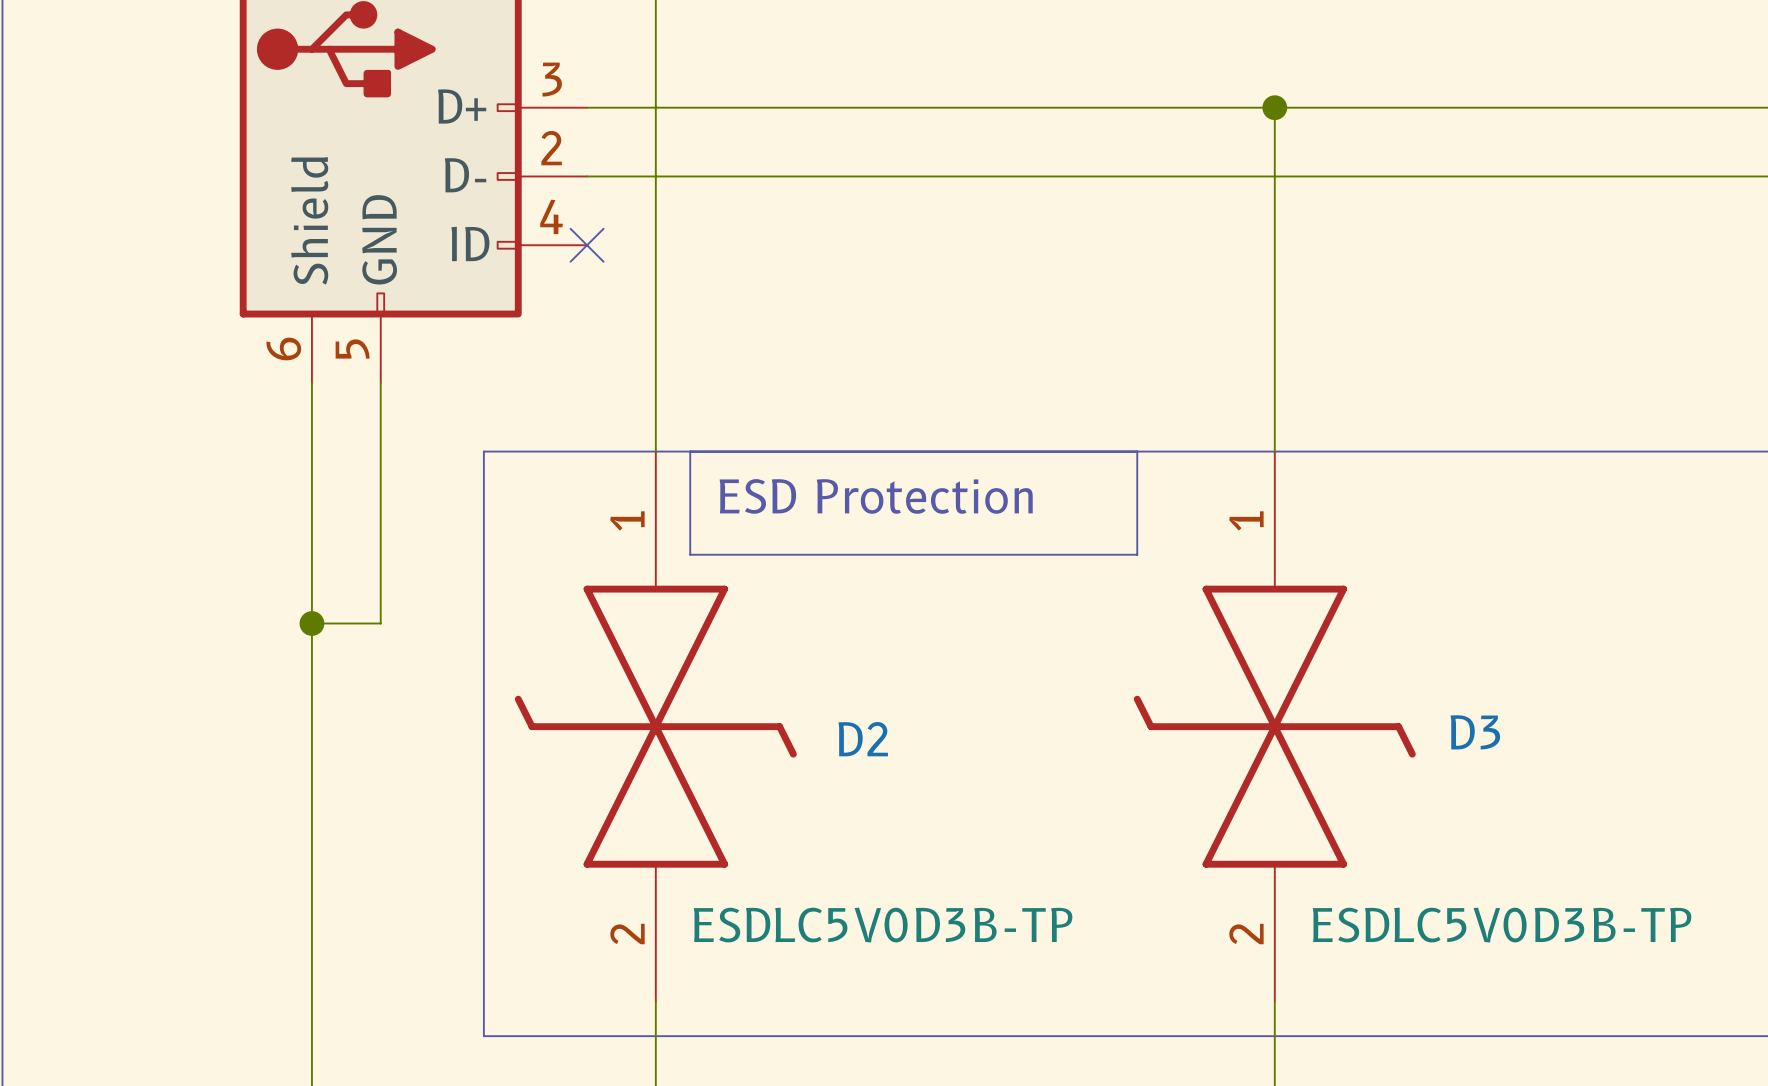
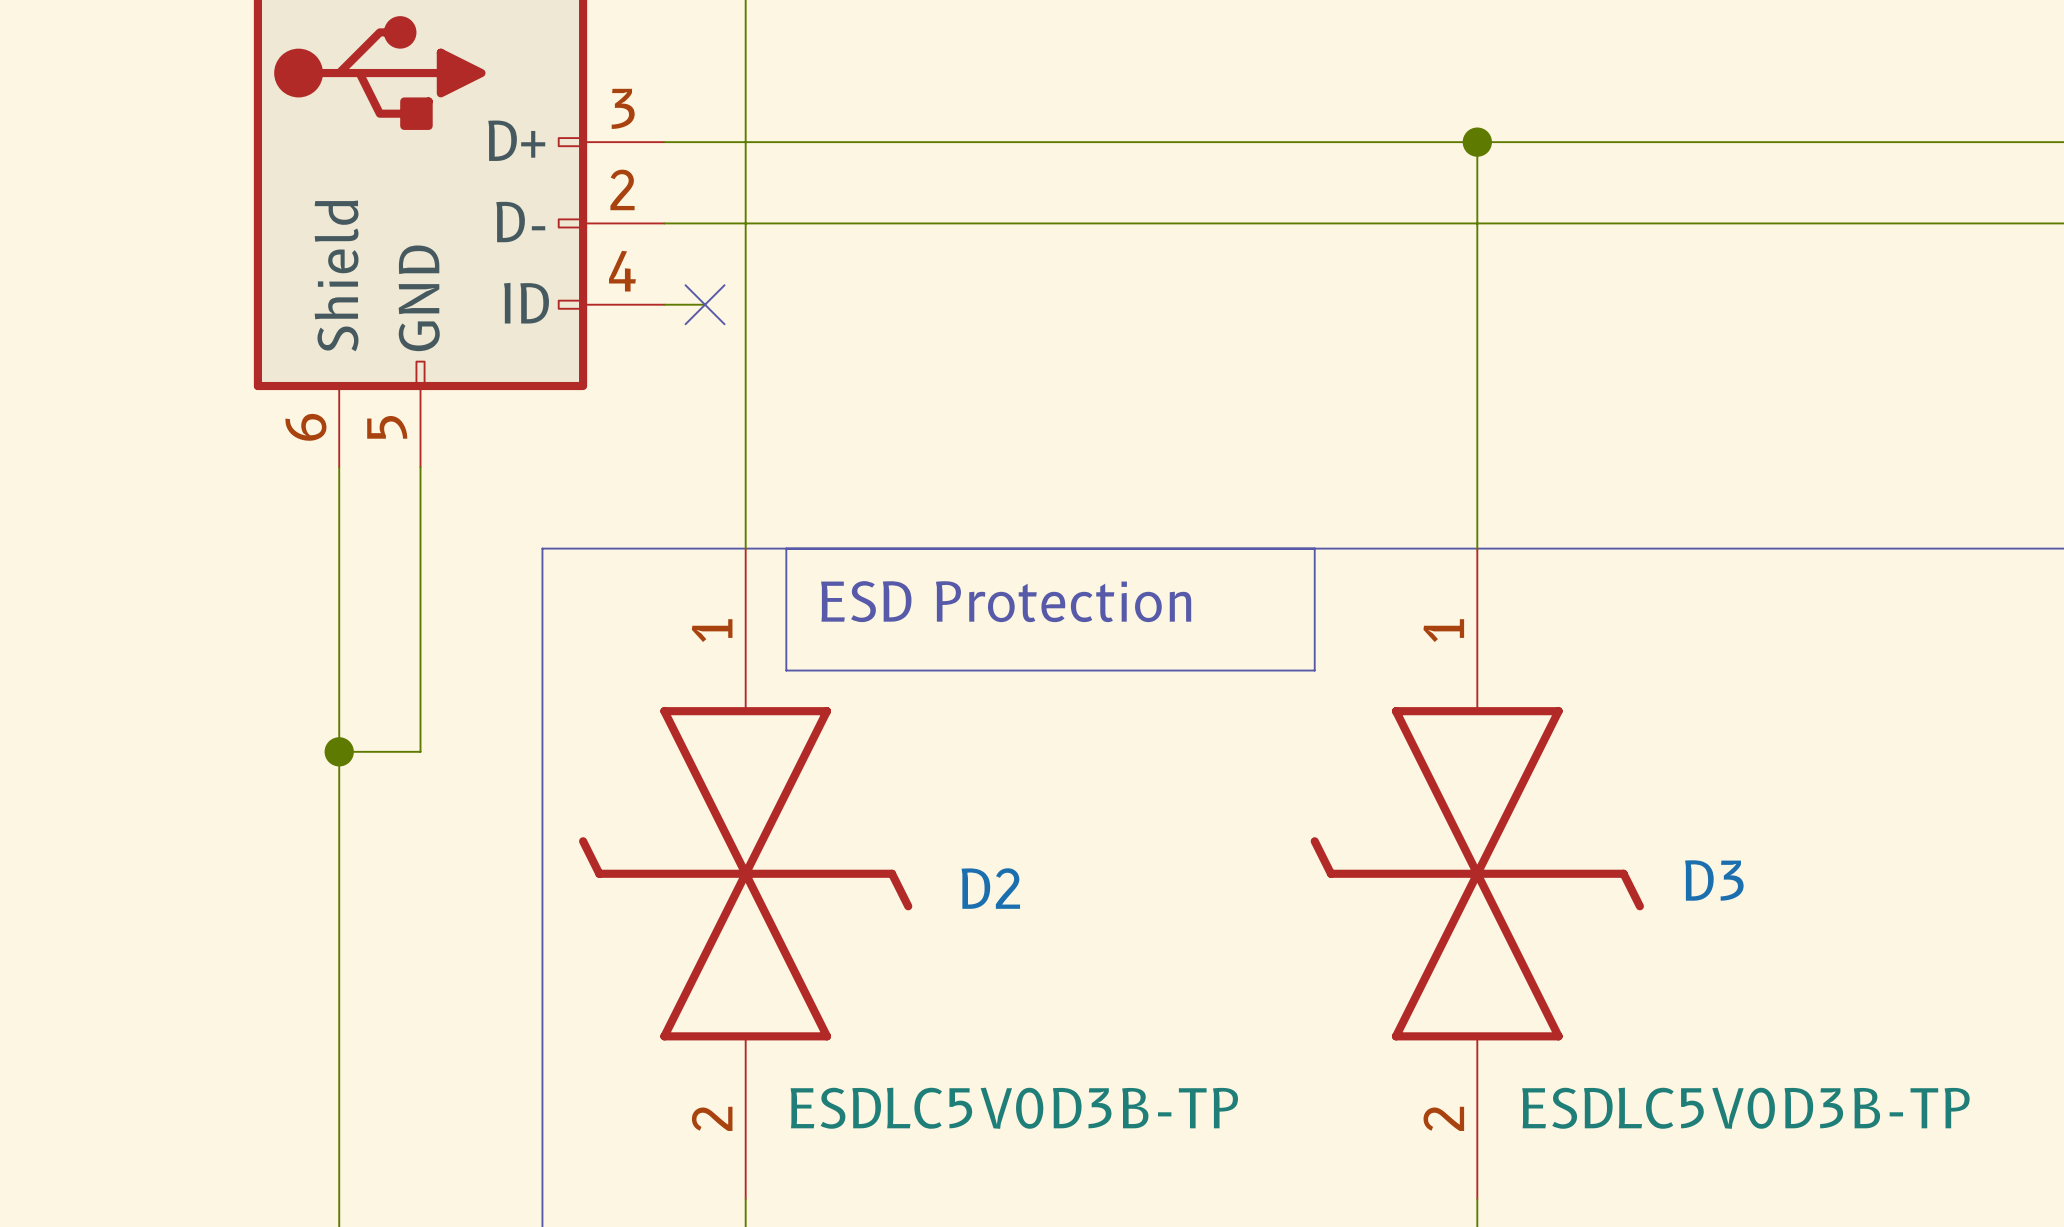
wire: none -> (664, 304) (705, 304)
no-connect mark position: (587, 245) -> (705, 304)

